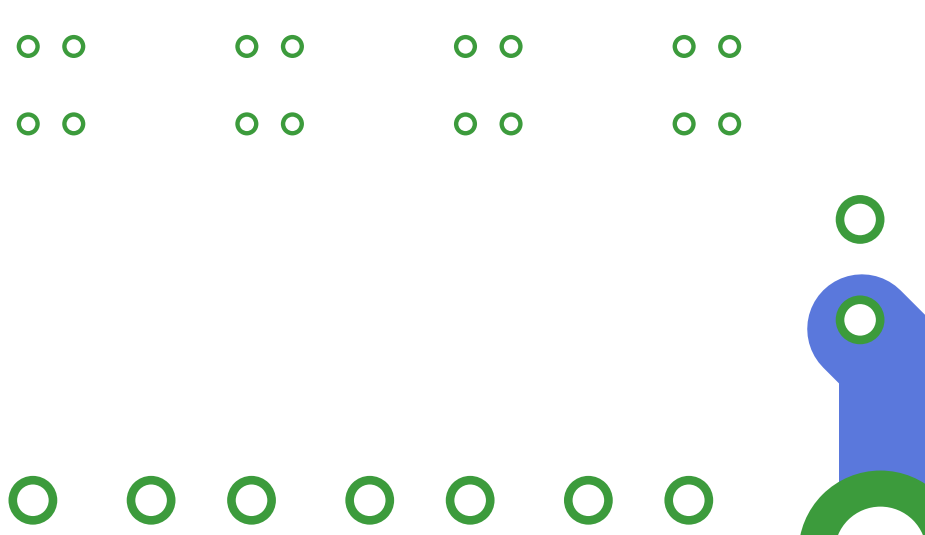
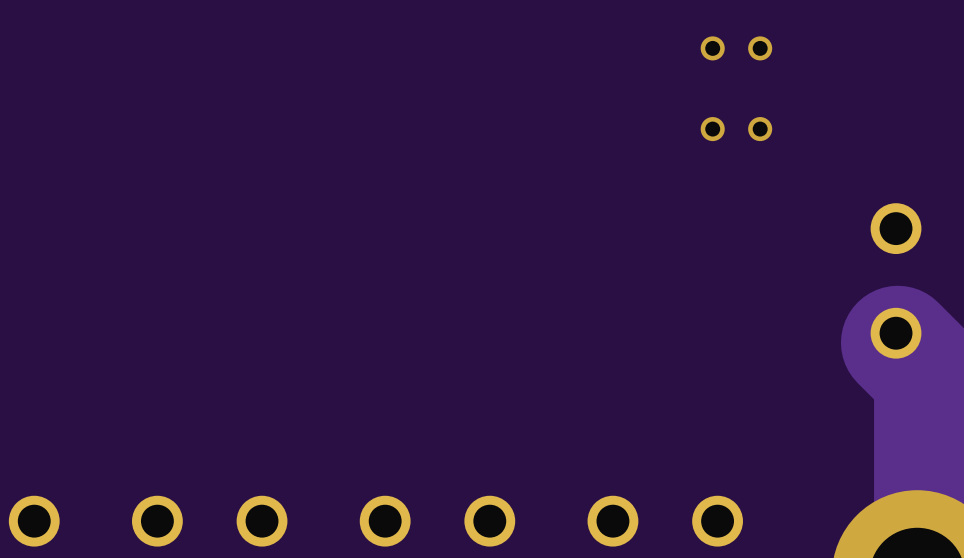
via: (28, 46) -> none
via: (73, 46) -> none
via: (246, 46) -> none
via: (292, 46) -> none
via: (465, 46) -> none
via: (511, 46) -> none
via: (28, 123) -> none
via: (73, 123) -> none
via: (246, 123) -> none
via: (292, 123) -> none
via: (465, 123) -> none
via: (511, 123) -> none

